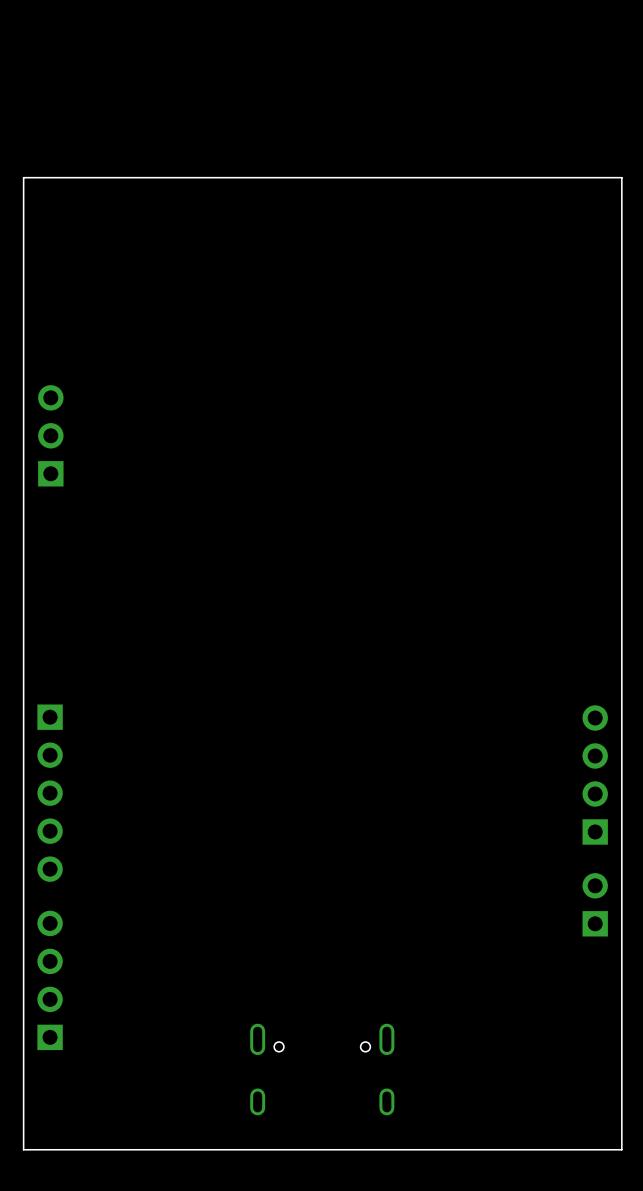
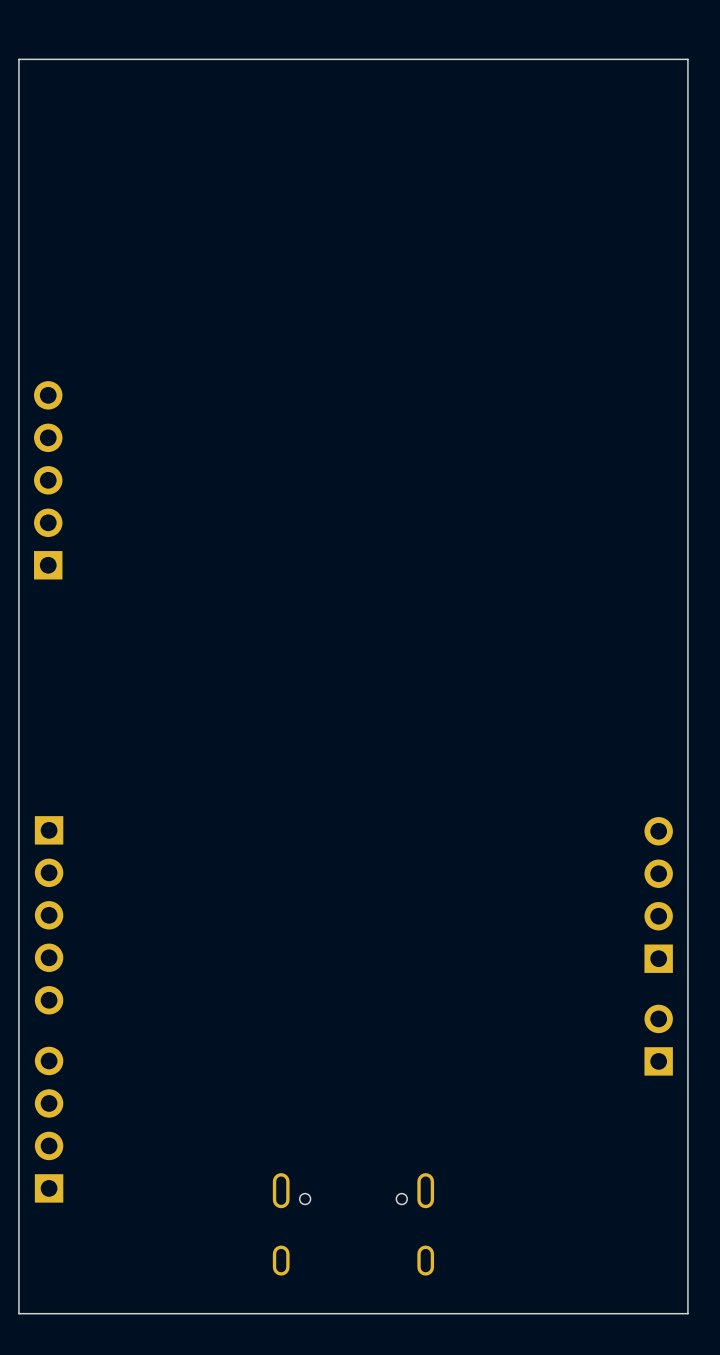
board edge: (621, 177) (23, 177) (23, 1149) (621, 1149) (621, 177) -> (687, 59) (687, 1313) (18, 1313) (18, 59) (687, 59)
part: none -> (48, 480)
part: (50, 435) -> none

